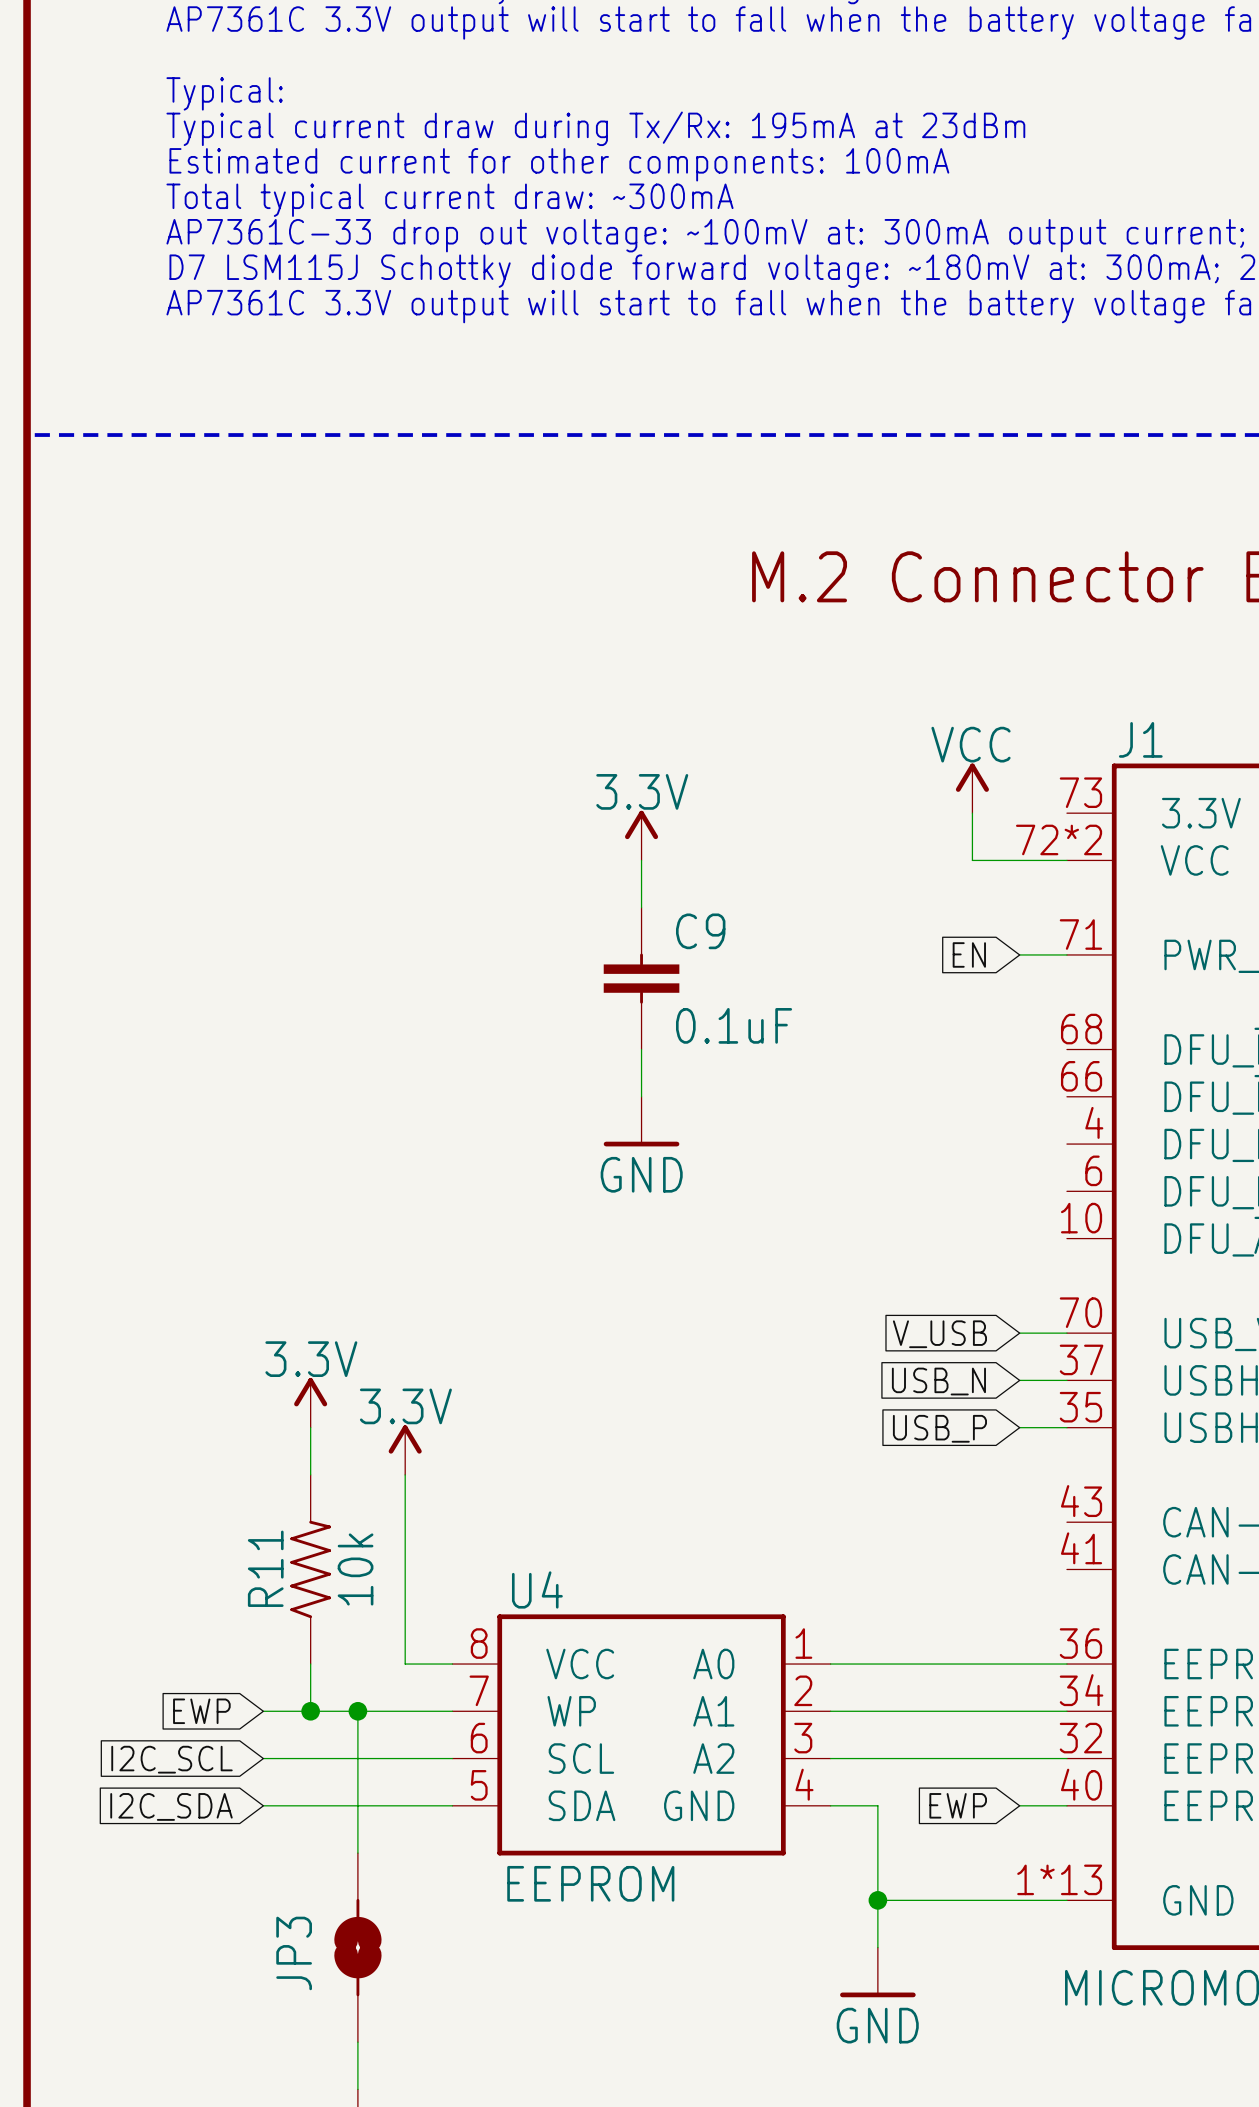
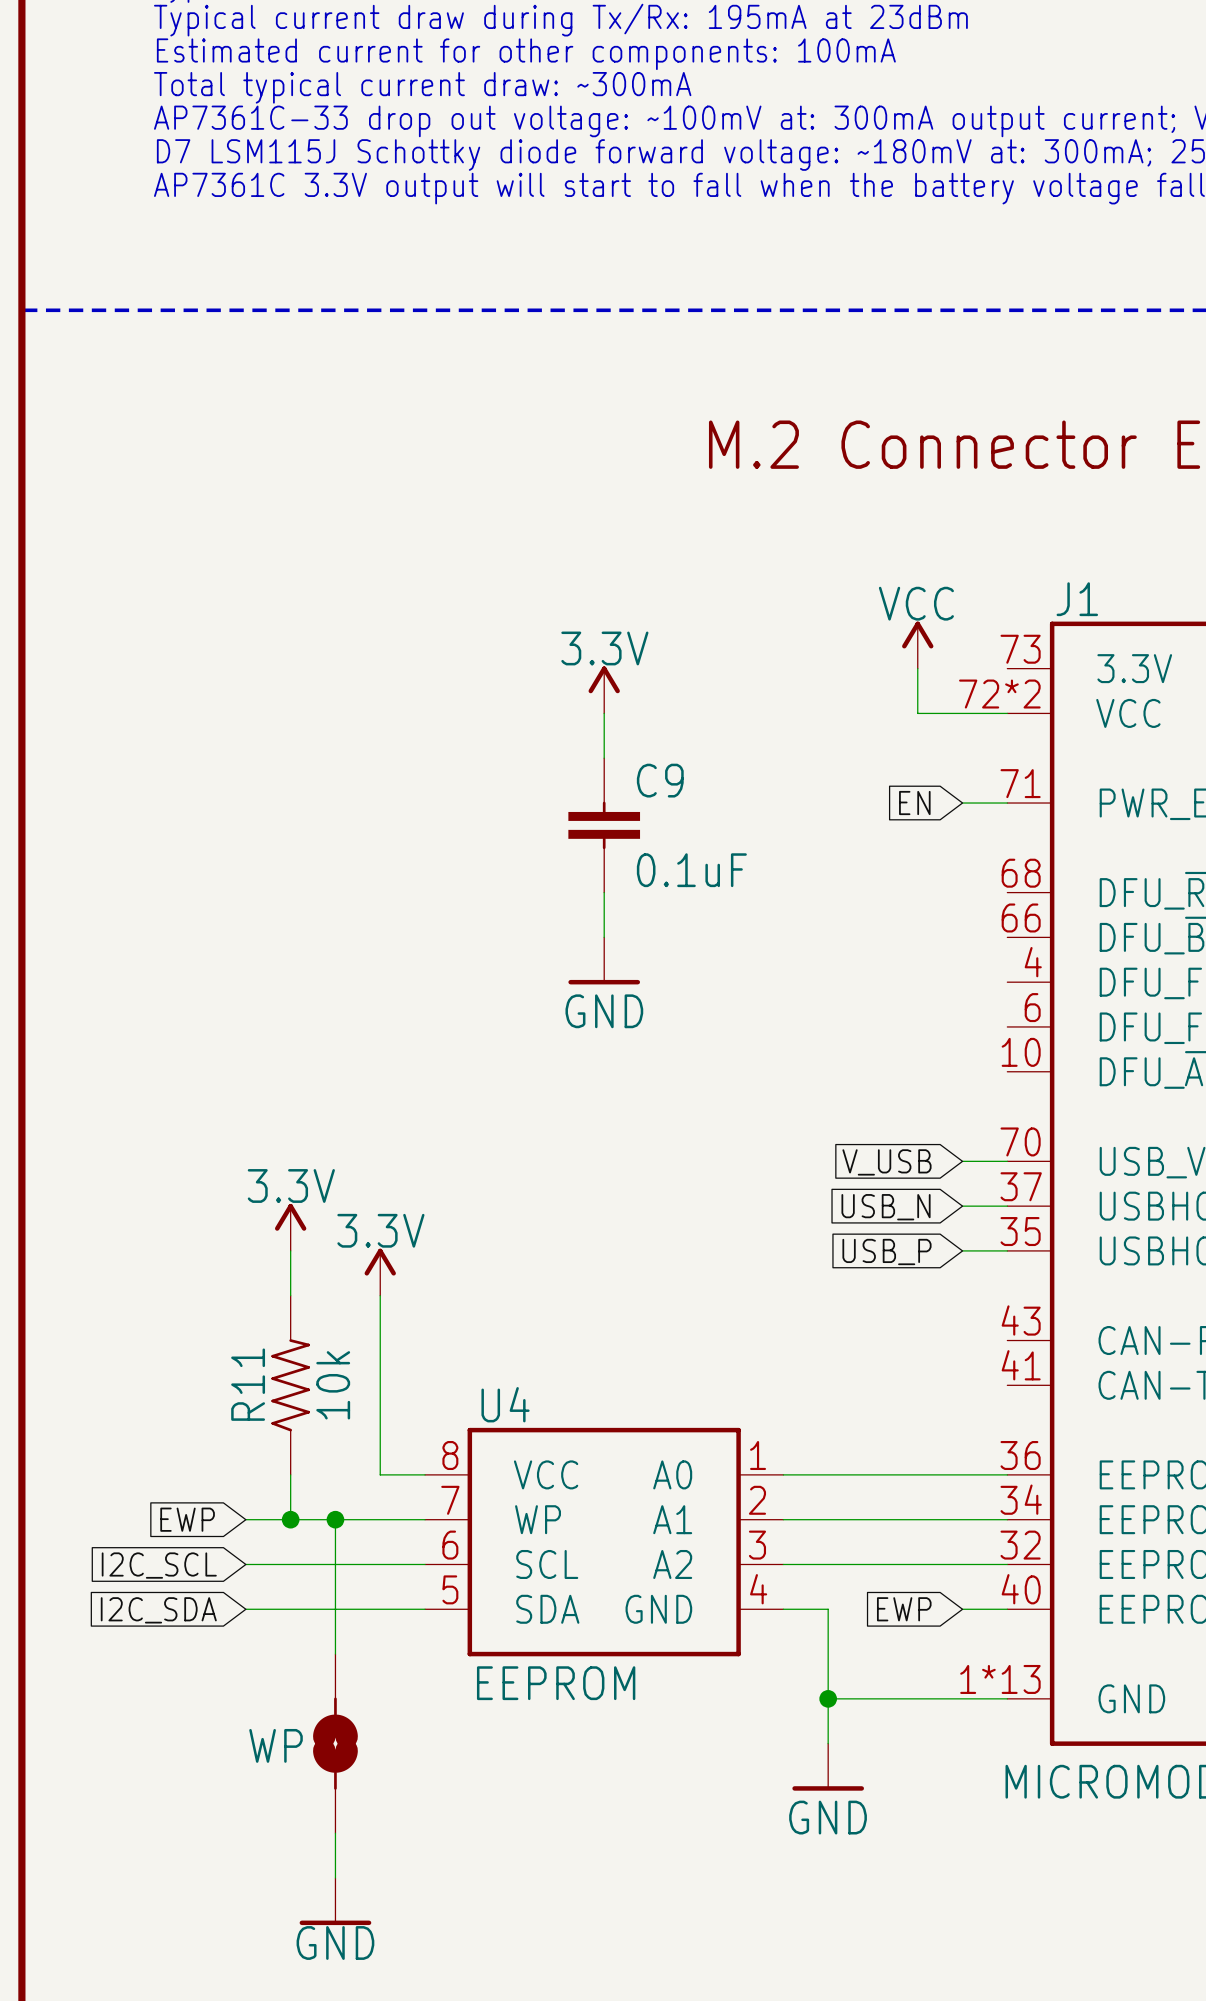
JP3 name: JP3 (294, 1953) -> WP (276, 1745)

